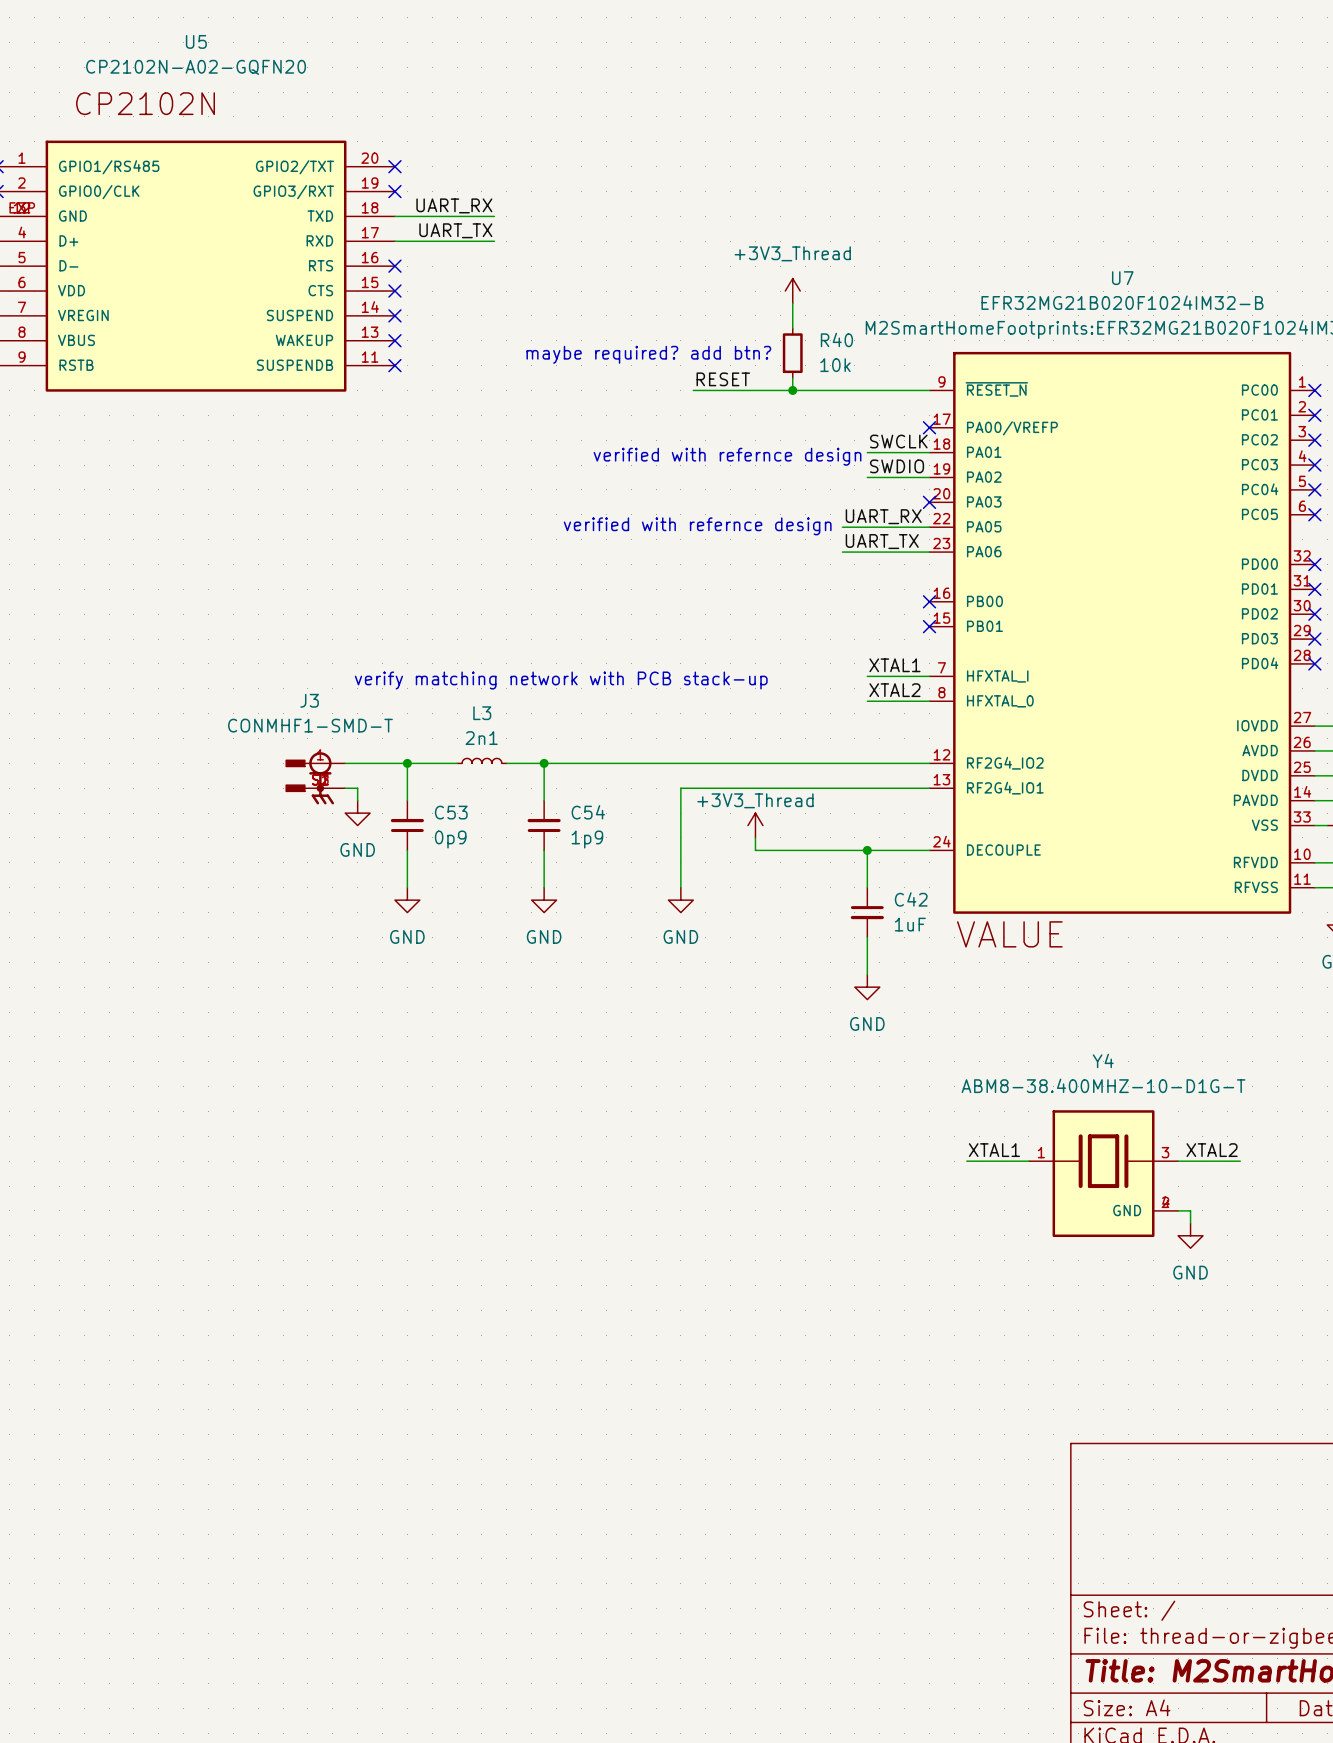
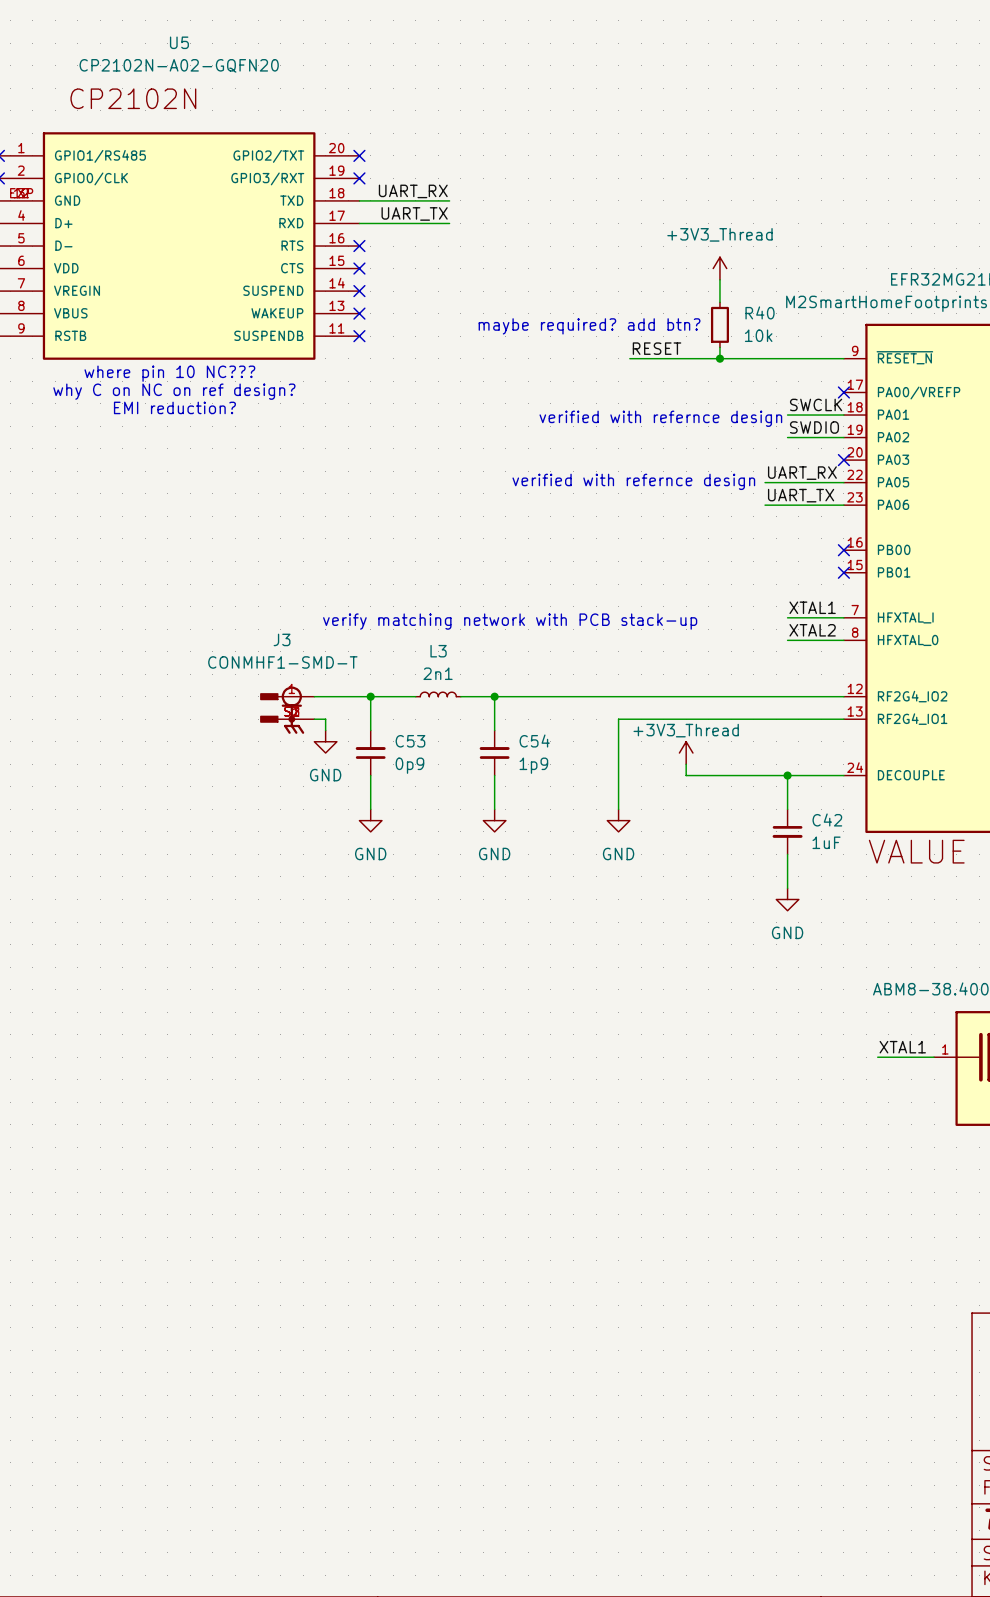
text: none -> where pin 10 NC??? (169, 373)
text: none -> why C on NC on ref design? (174, 391)
text: none -> EMI reduction? (174, 407)

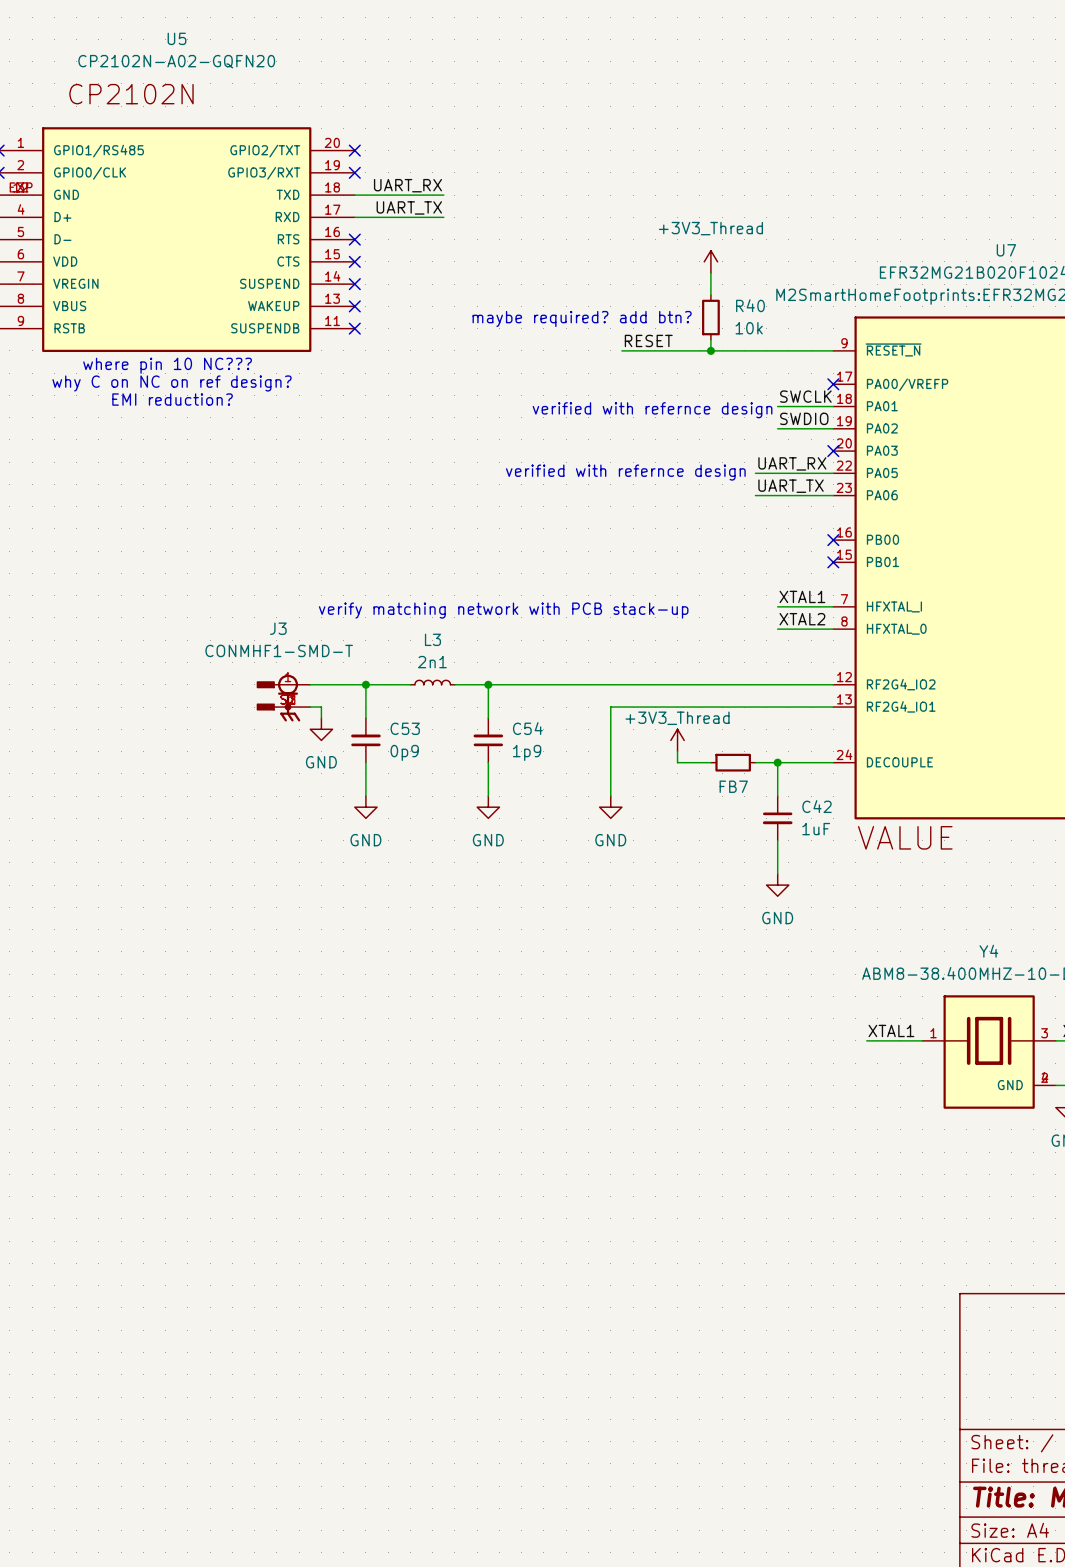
wire: (719, 775) (765, 775) -> none
FB7: none -> (733, 762)

